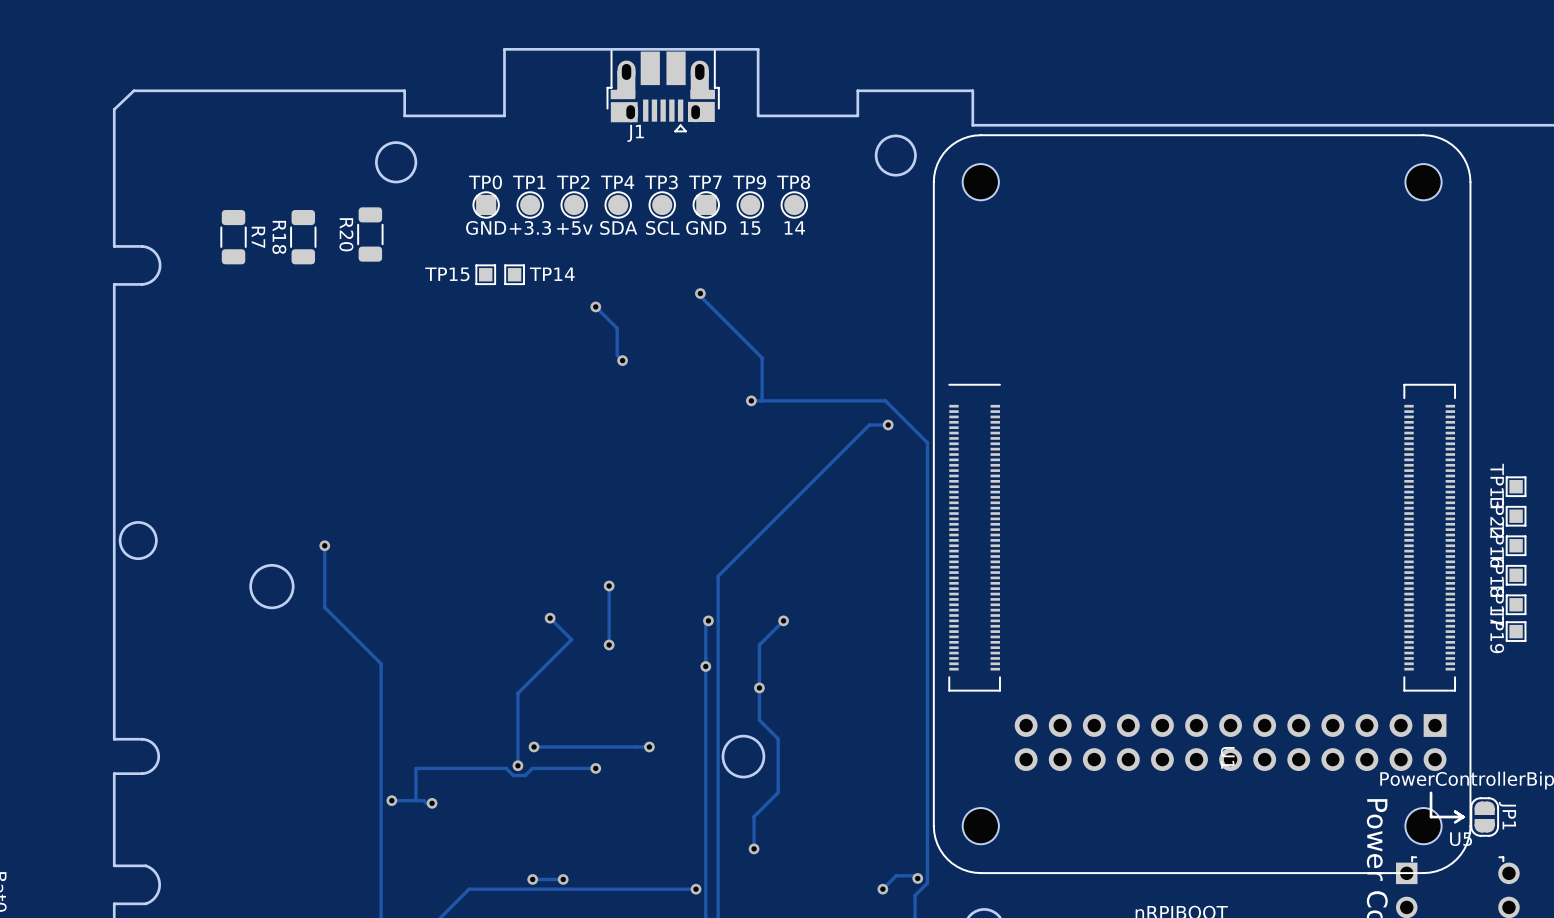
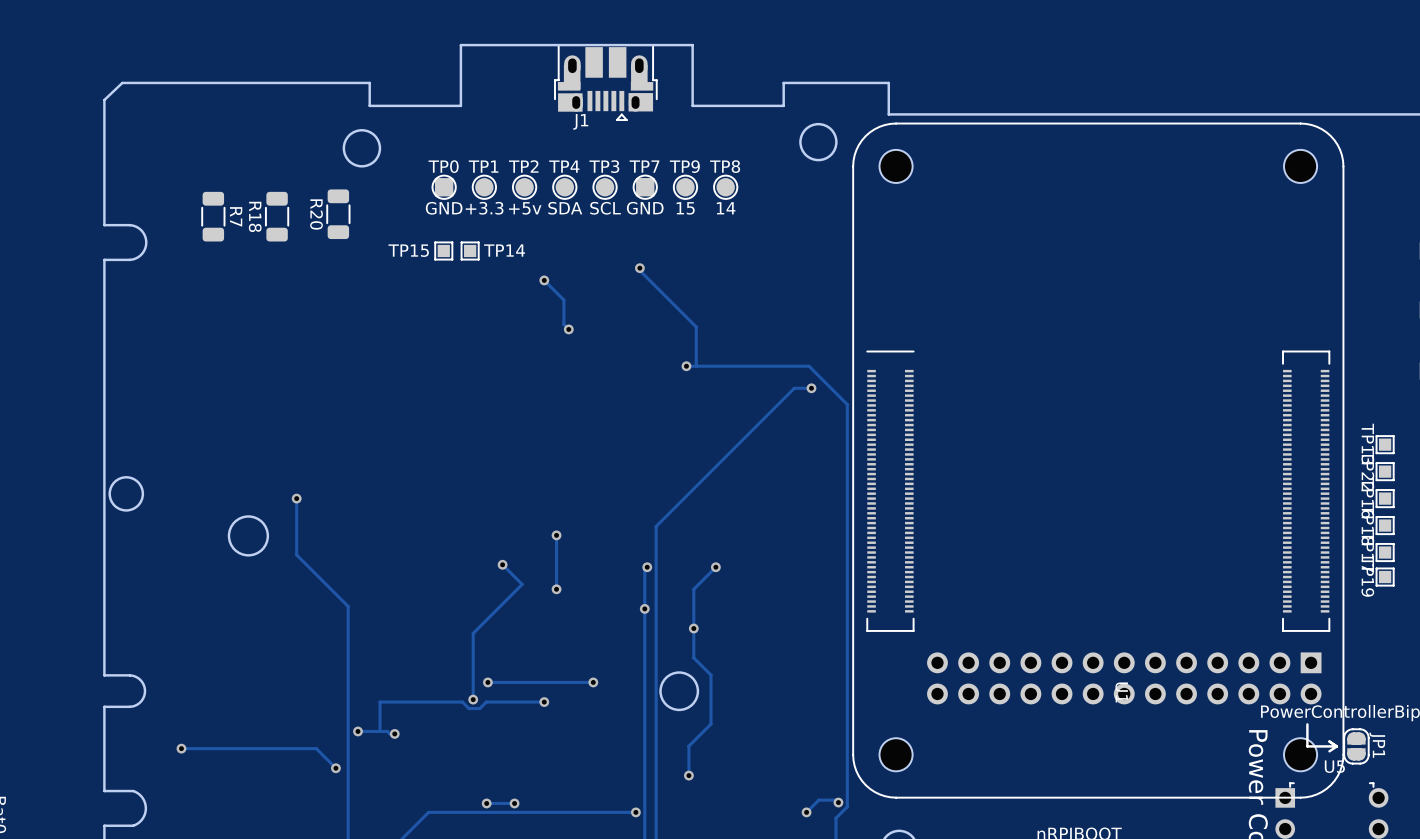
track: none -> (181, 748) (316, 748) (335, 768)
via: none -> (181, 748)
via: none -> (335, 768)

